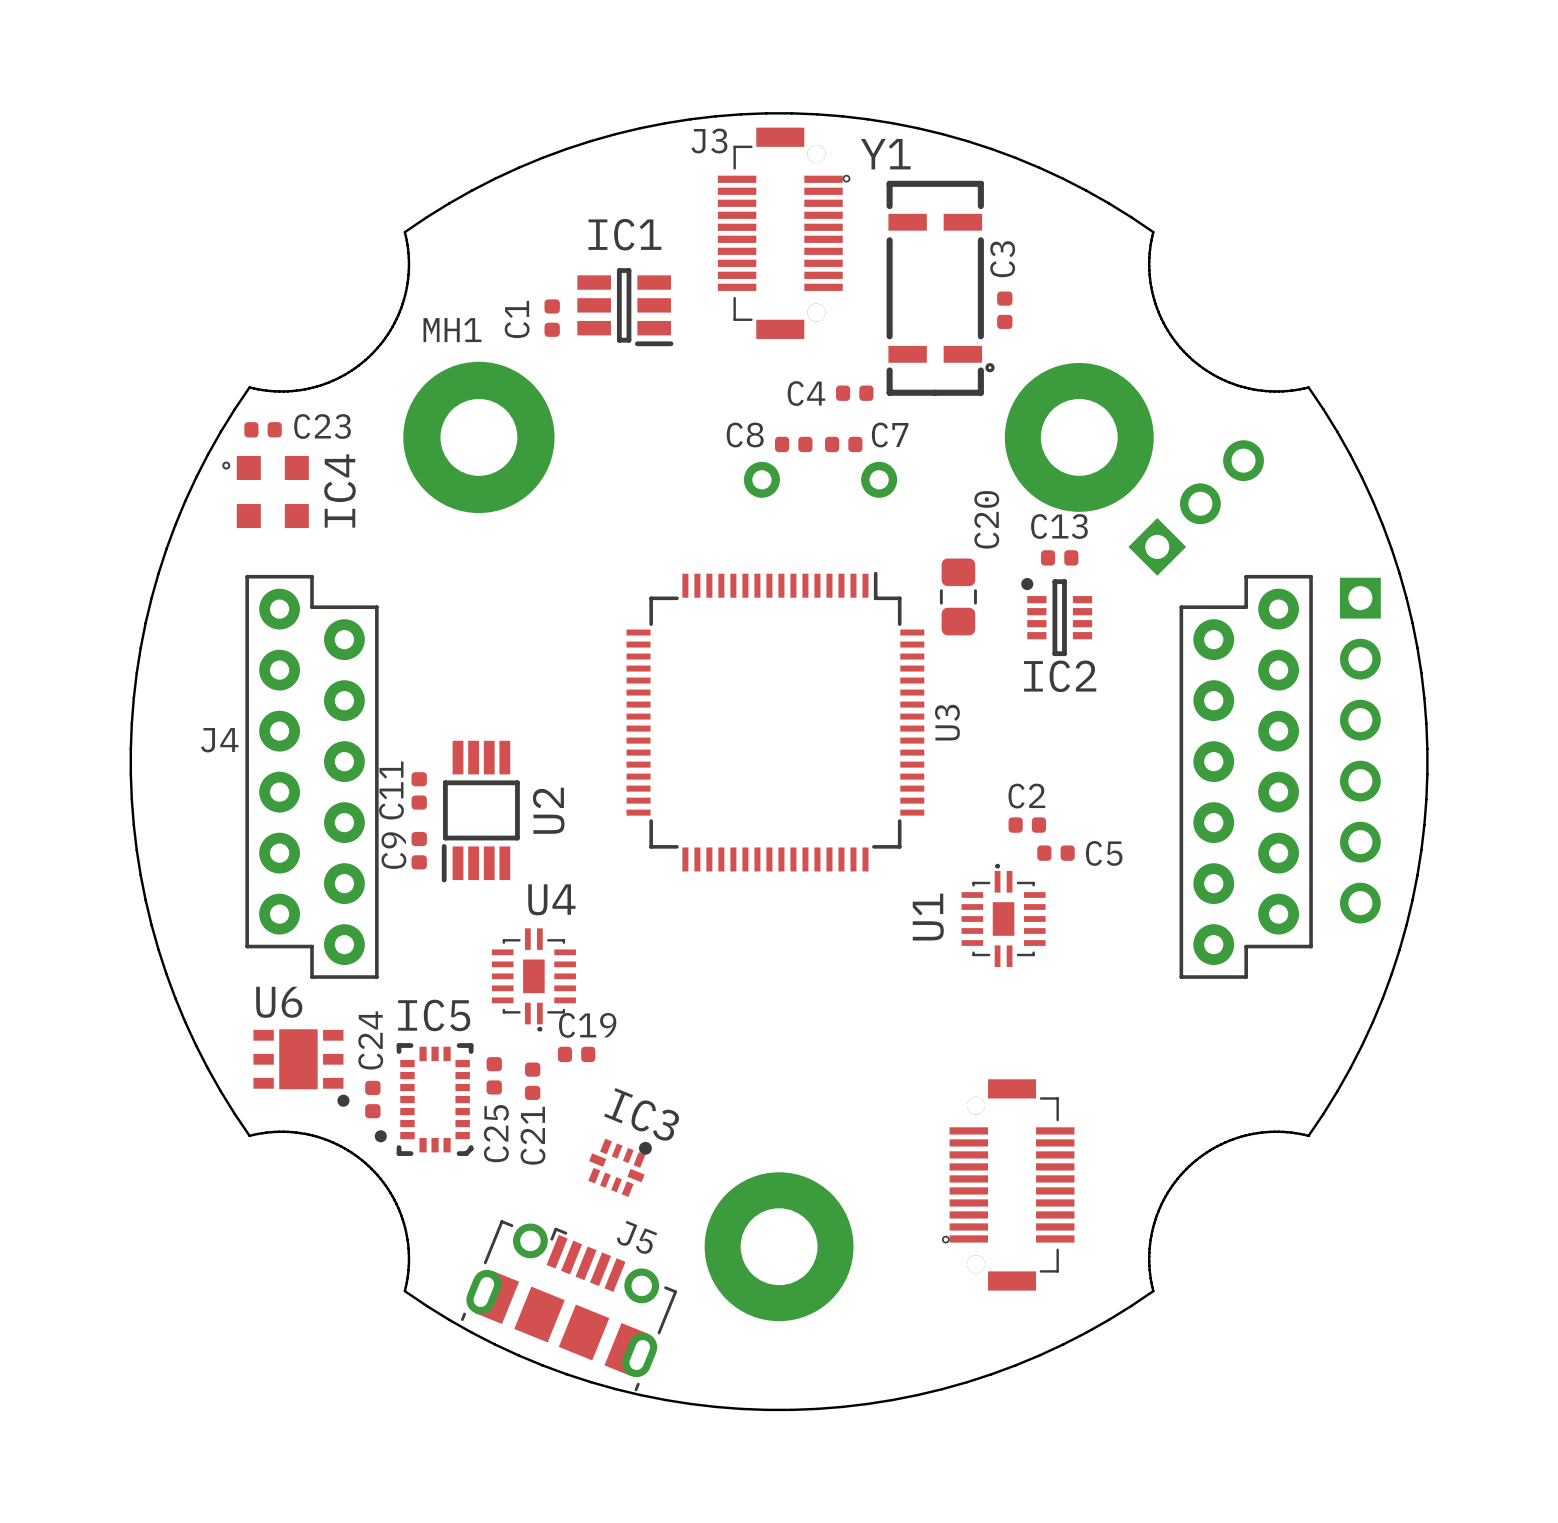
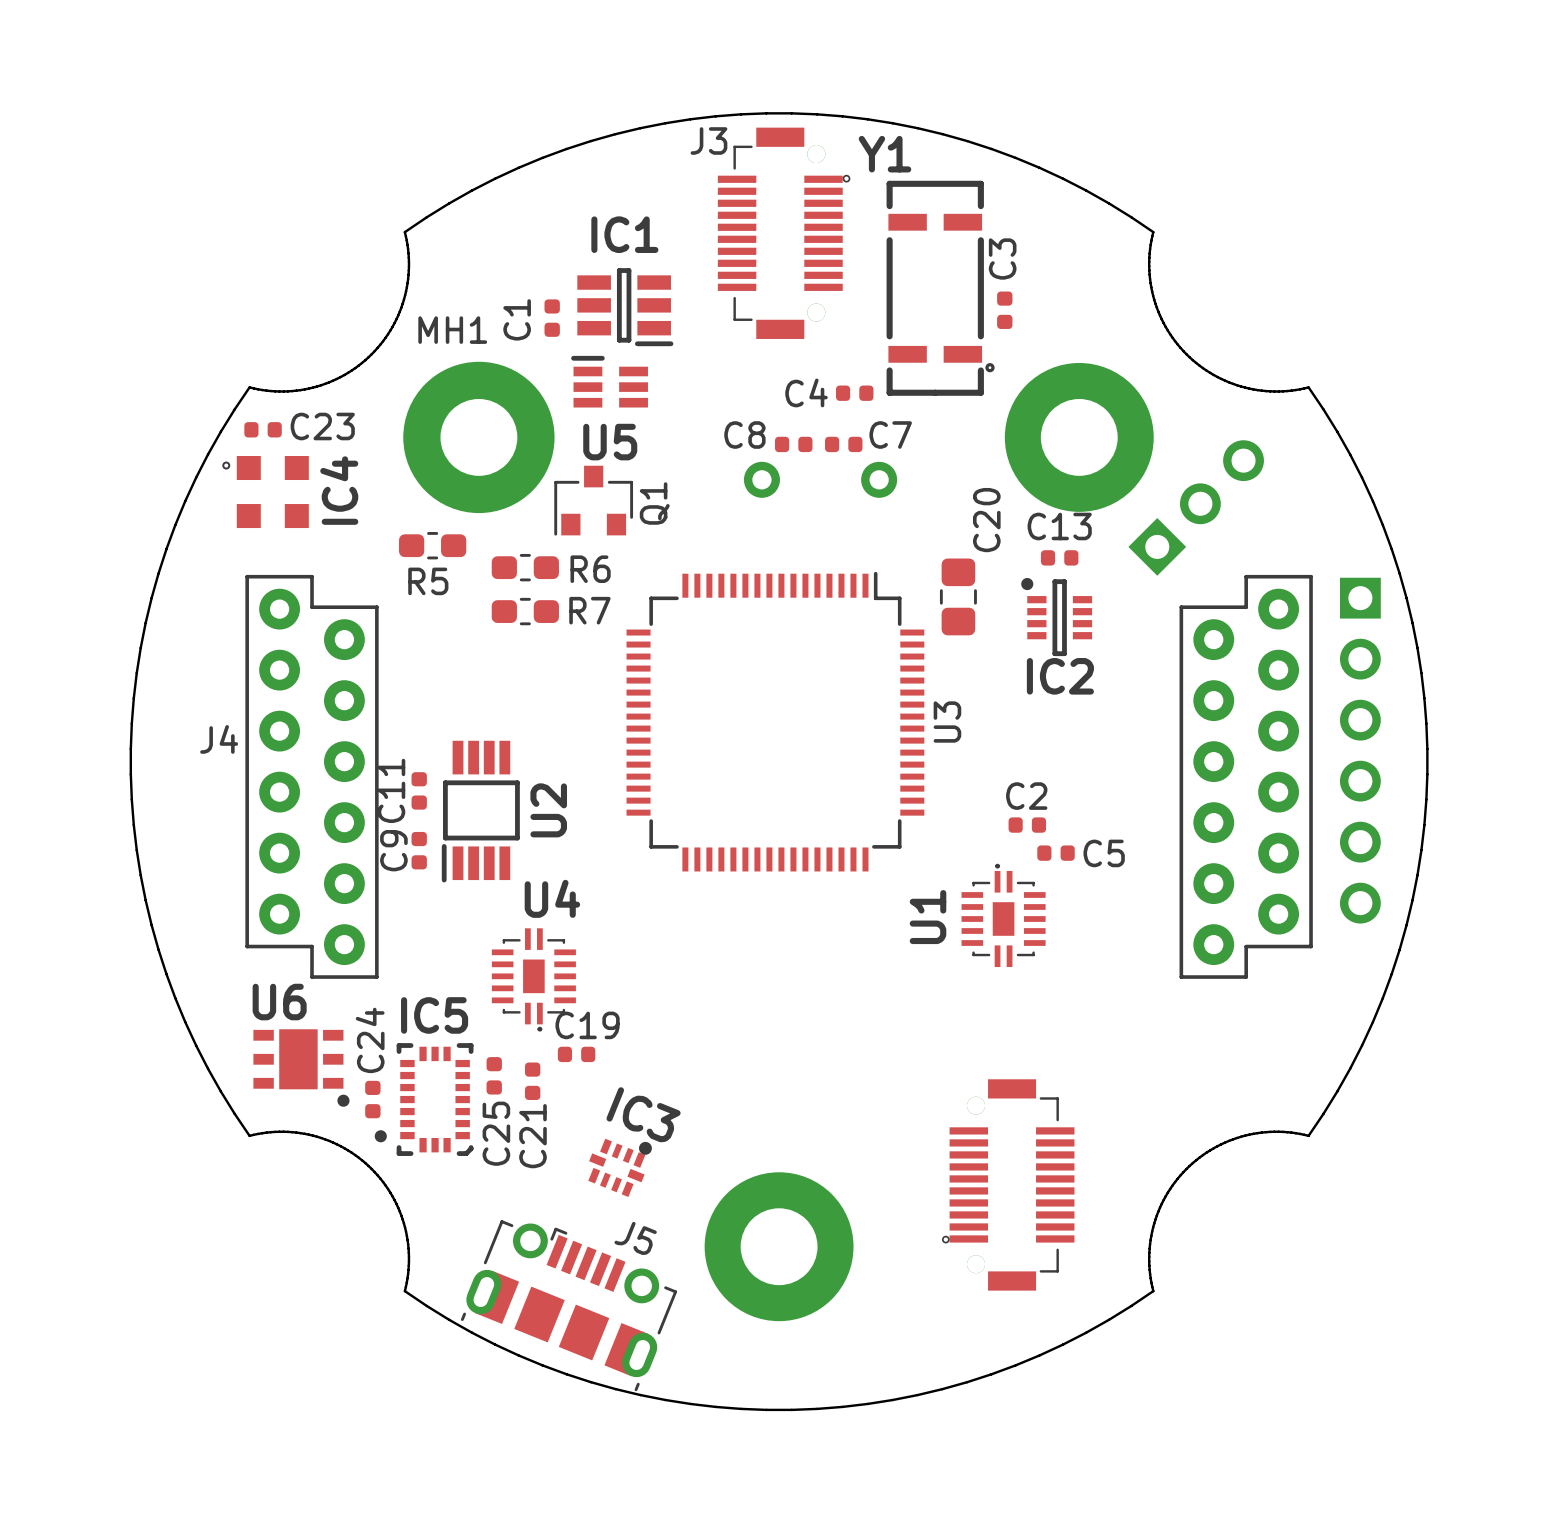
U5: none -> (609, 381)
Q1: none -> (593, 500)
R5: none -> (432, 545)
R6: none -> (525, 567)
R7: none -> (525, 611)

